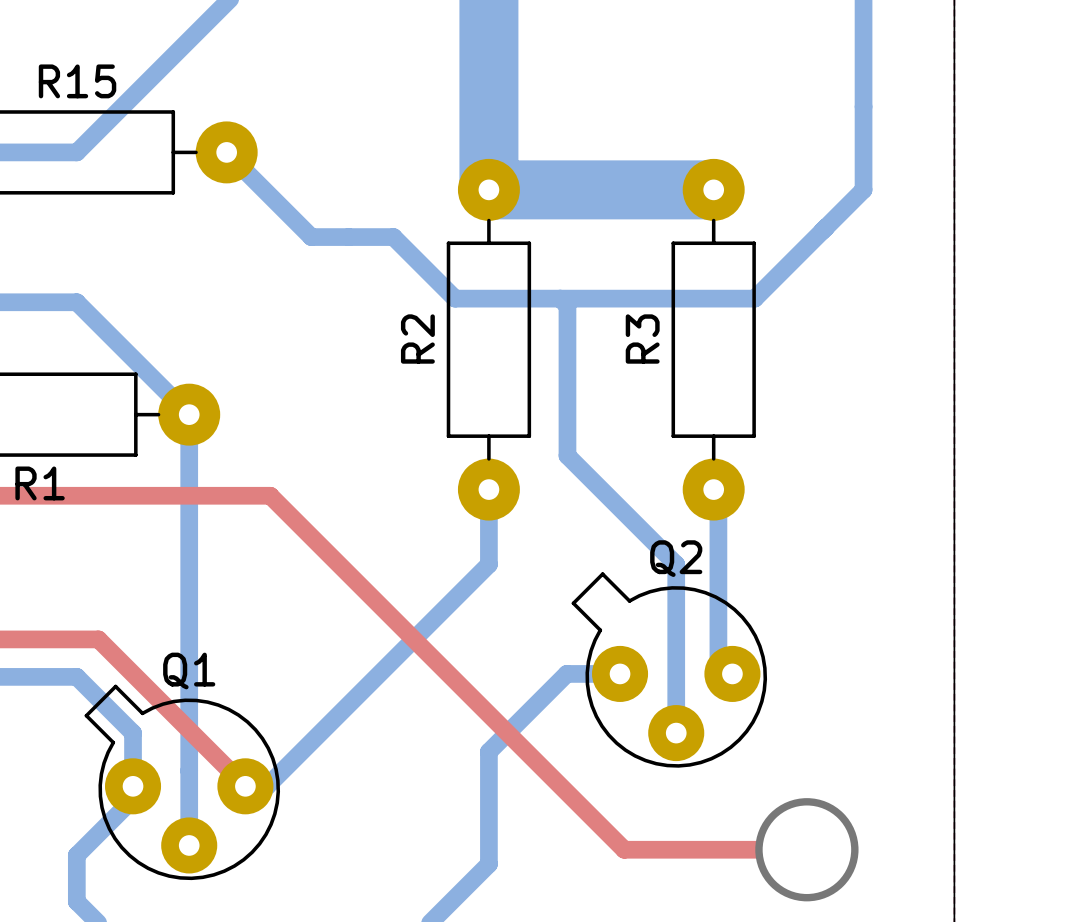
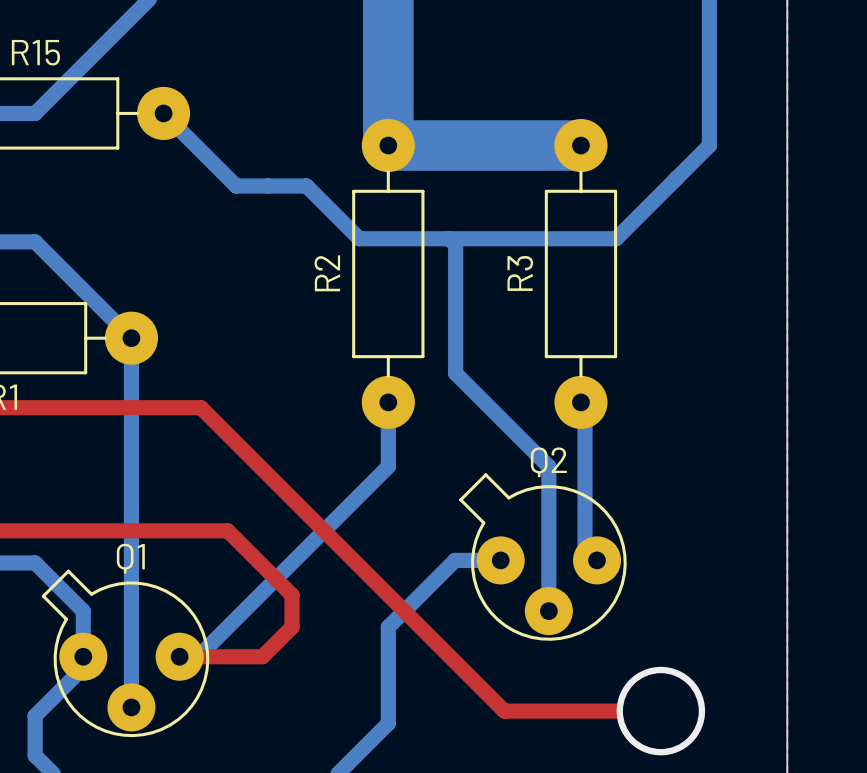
top track: (98, 639) (245, 786) -> (53, 530) (227, 530) (292, 595) (292, 627) (262, 656) (179, 656)

